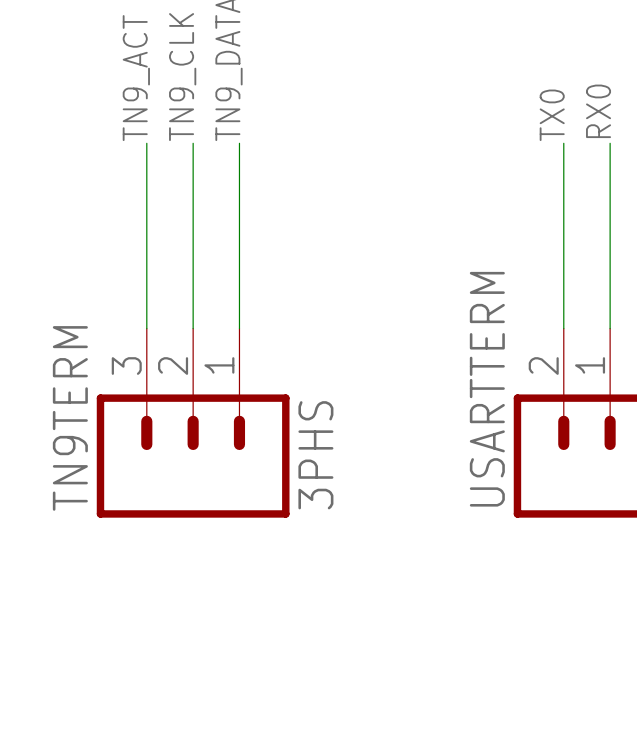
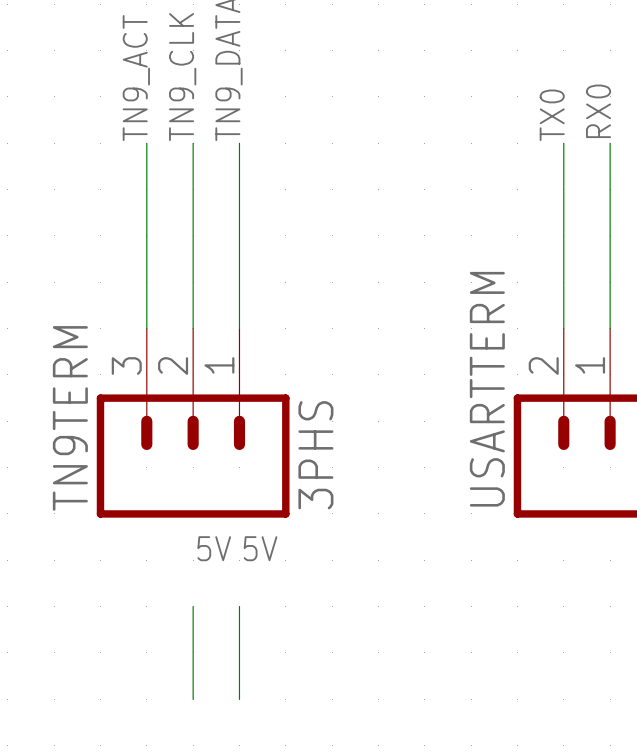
label: none -> 5V (214, 548)
label: none -> 5V (260, 548)
wire: none -> (193, 606) (193, 699)
wire: none -> (239, 606) (239, 699)

